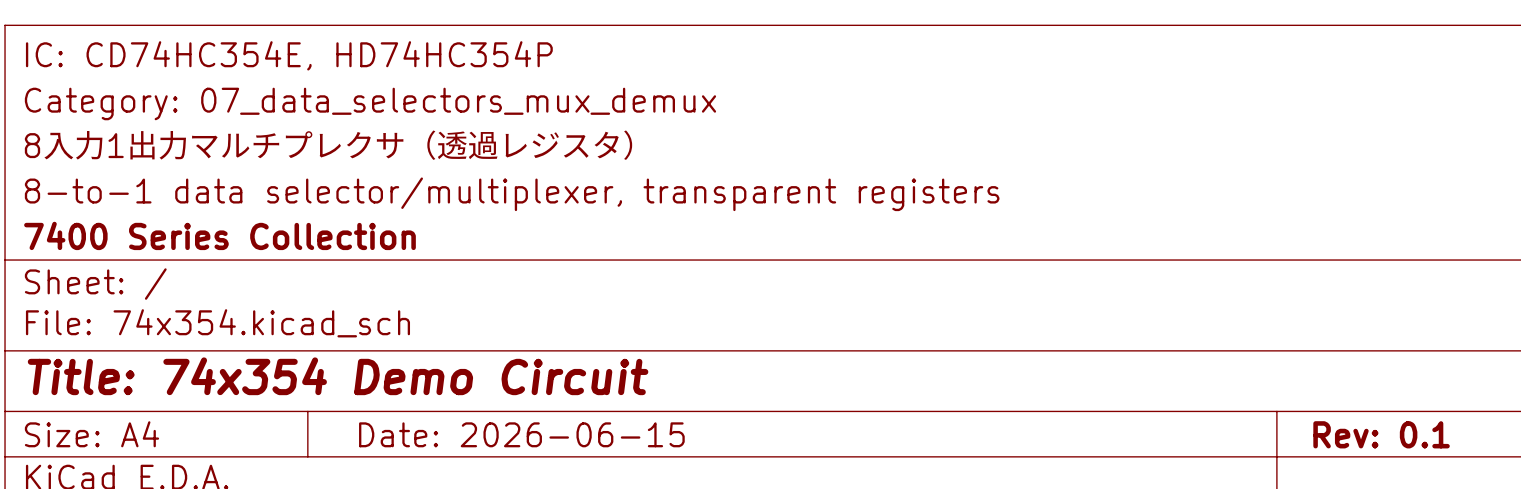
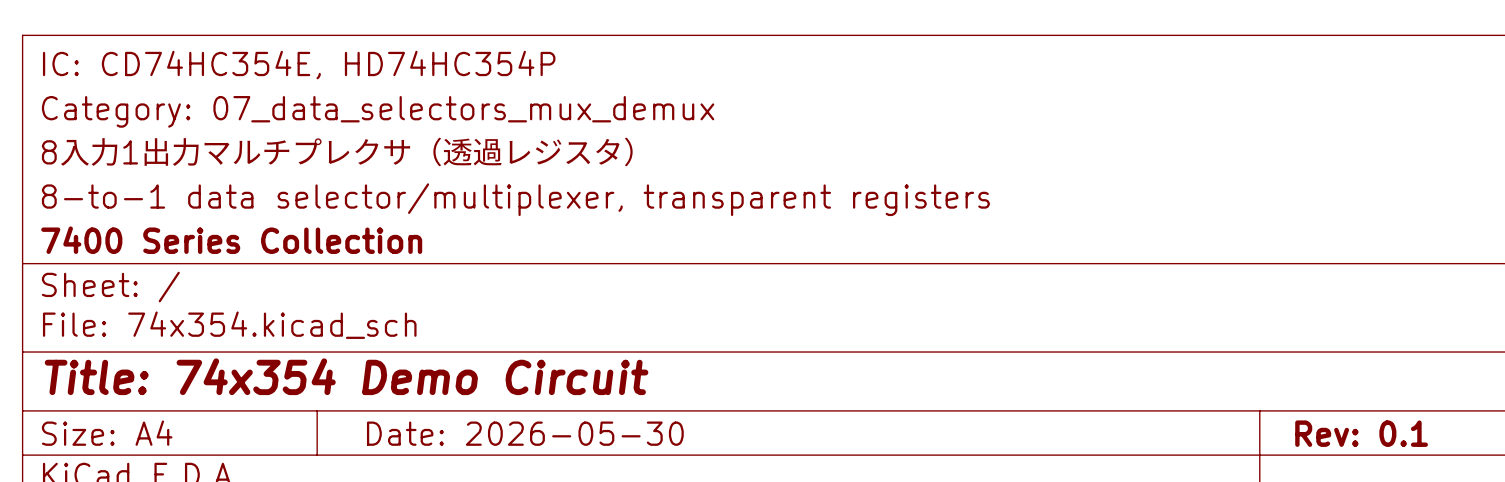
title block: Date: 2026-06-15 (521, 434) -> Date: 2026-05-30 (525, 433)

